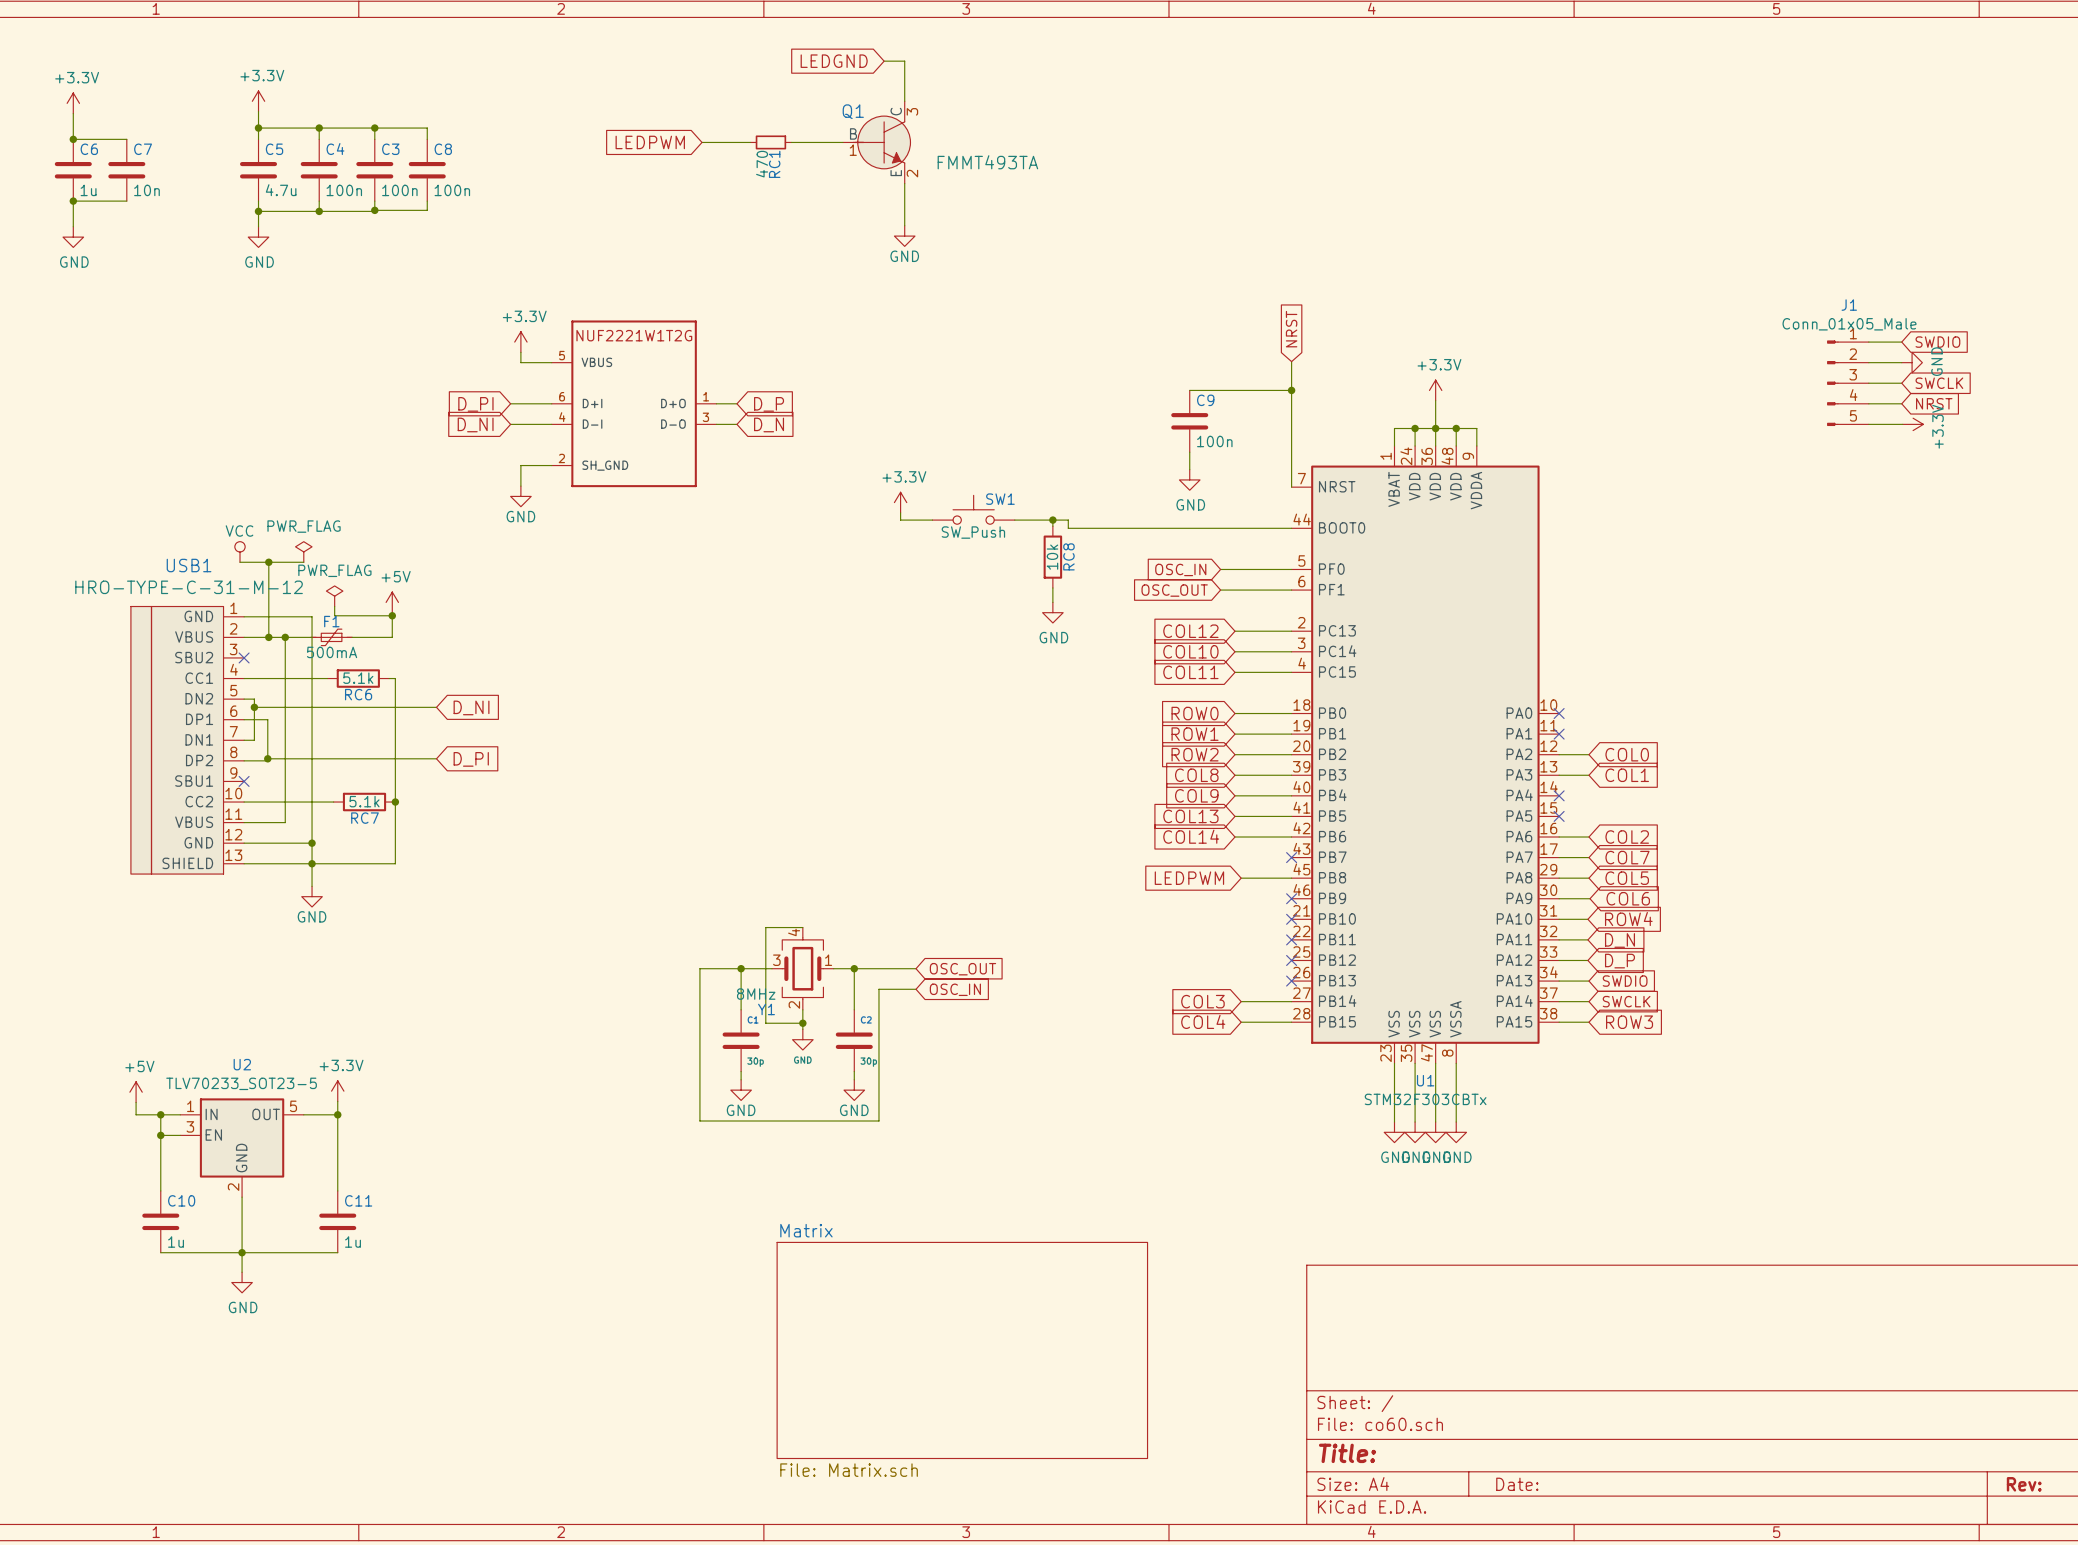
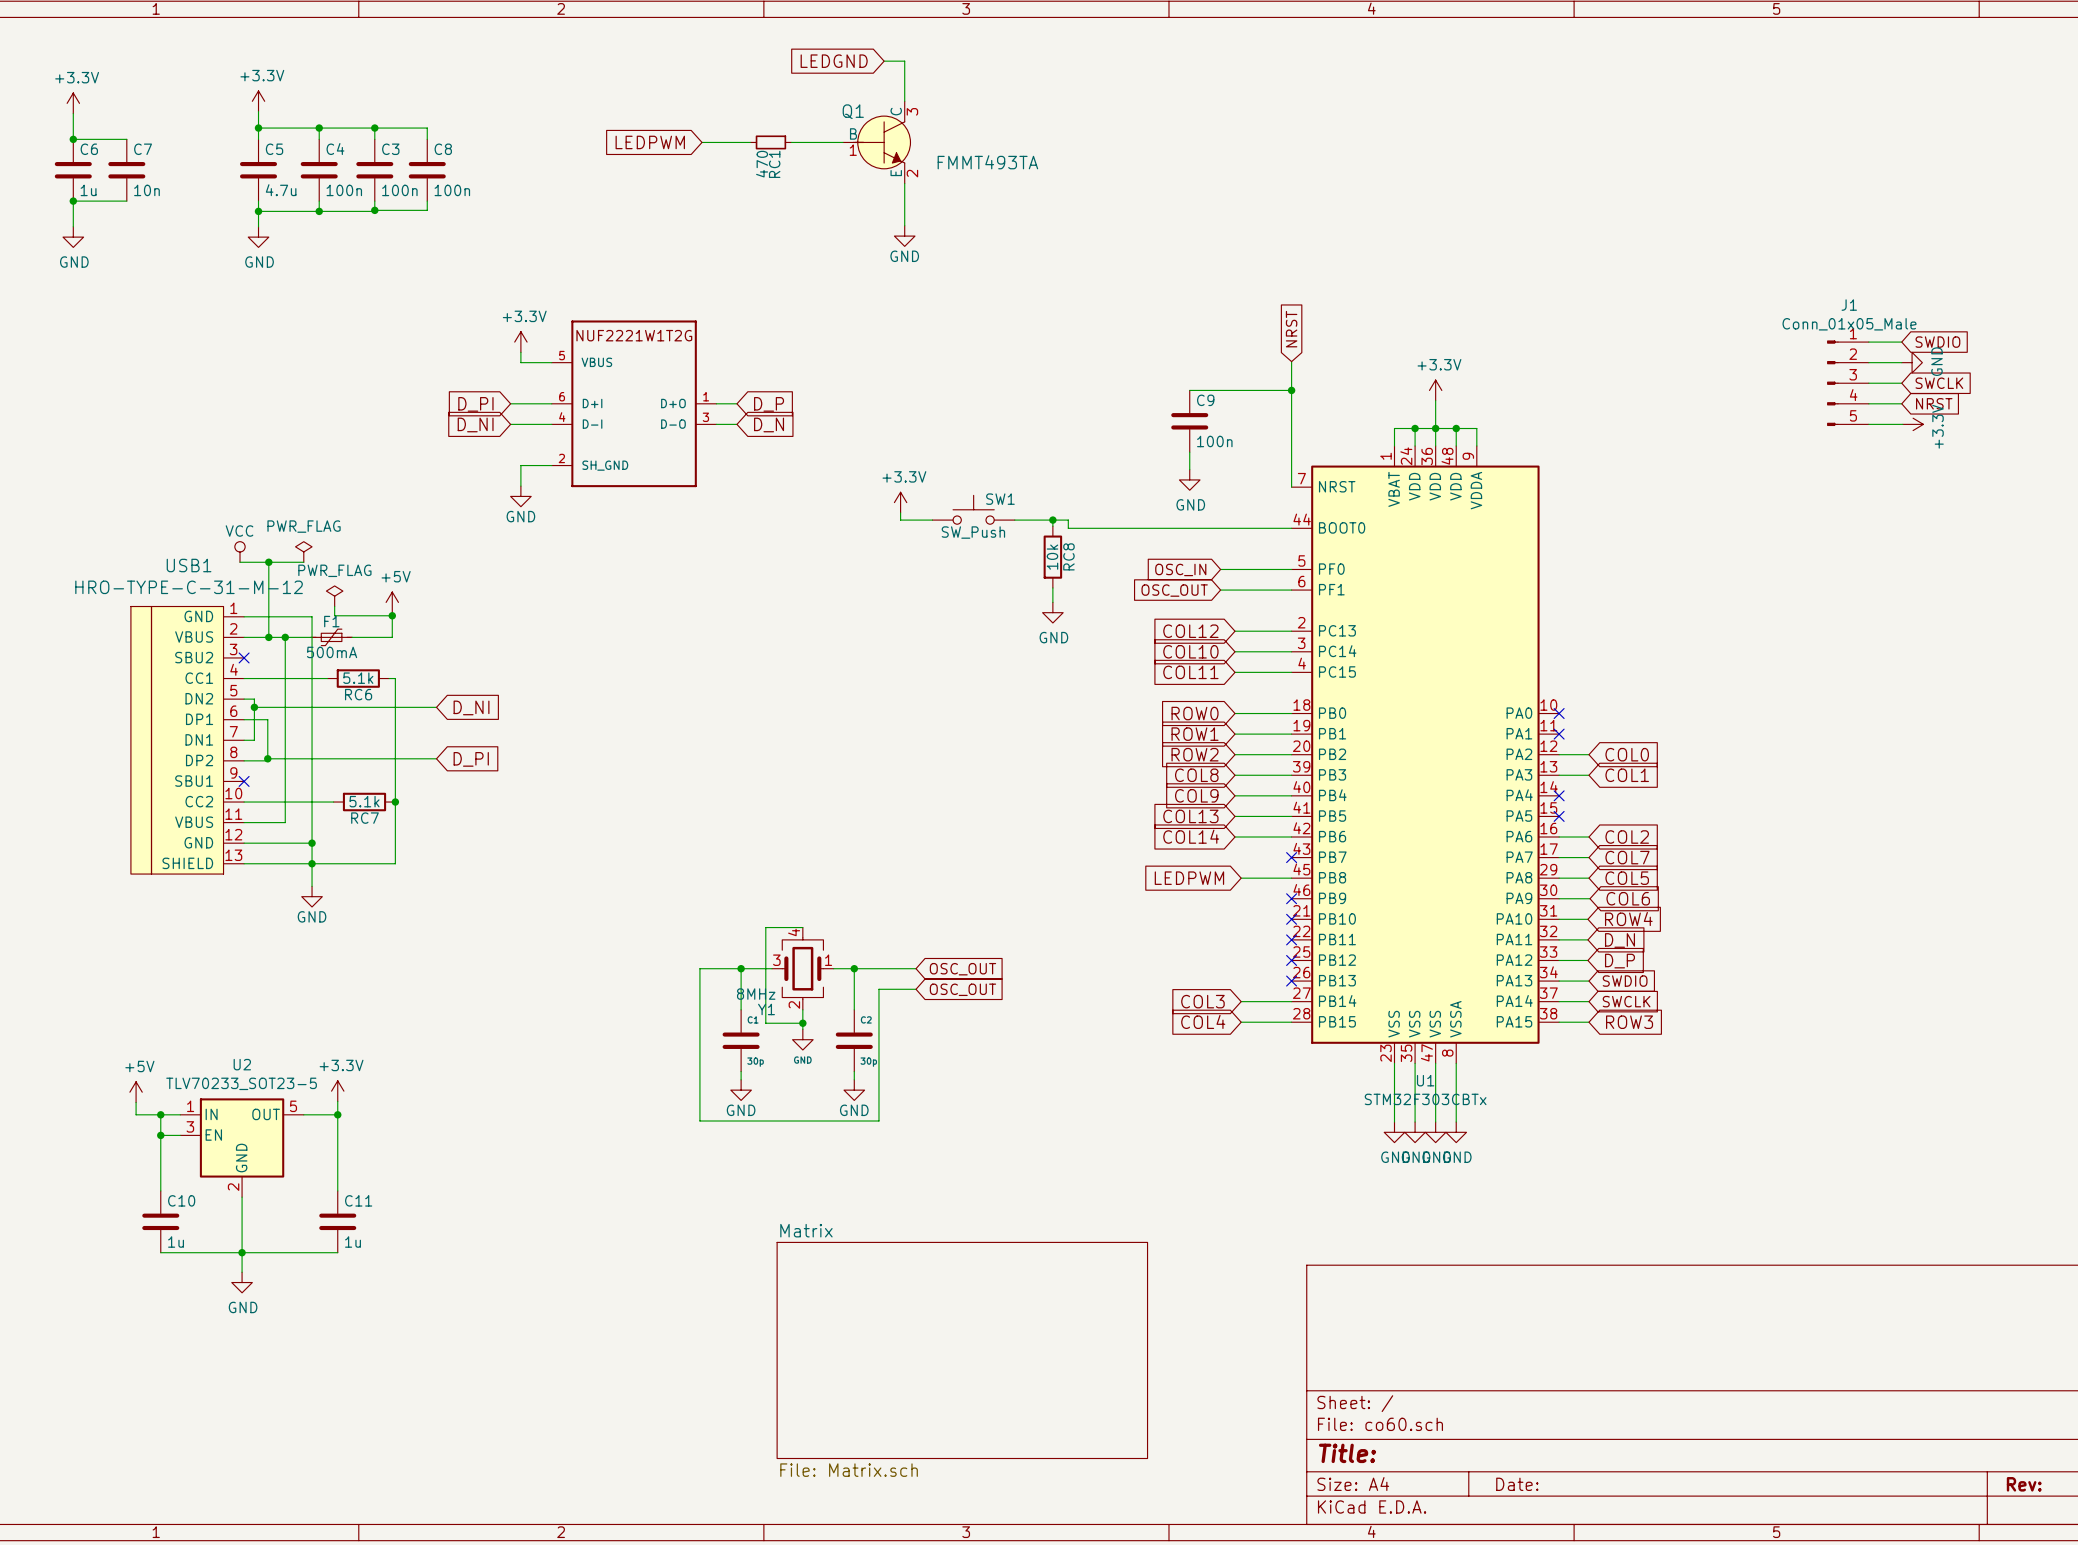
global label: OSC_IN (955, 989) -> OSC_OUT (962, 989)

